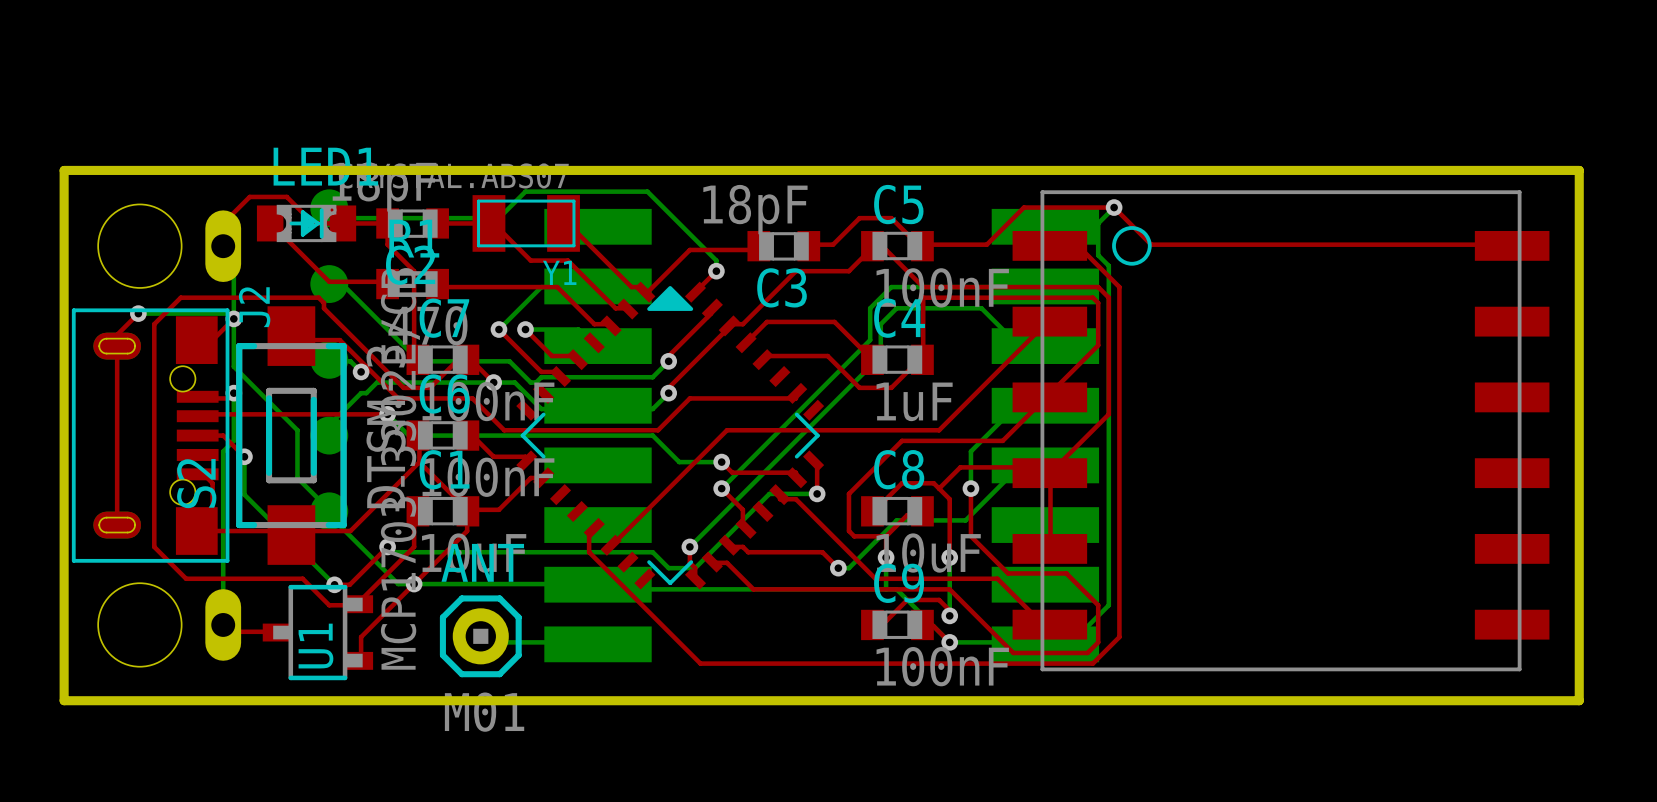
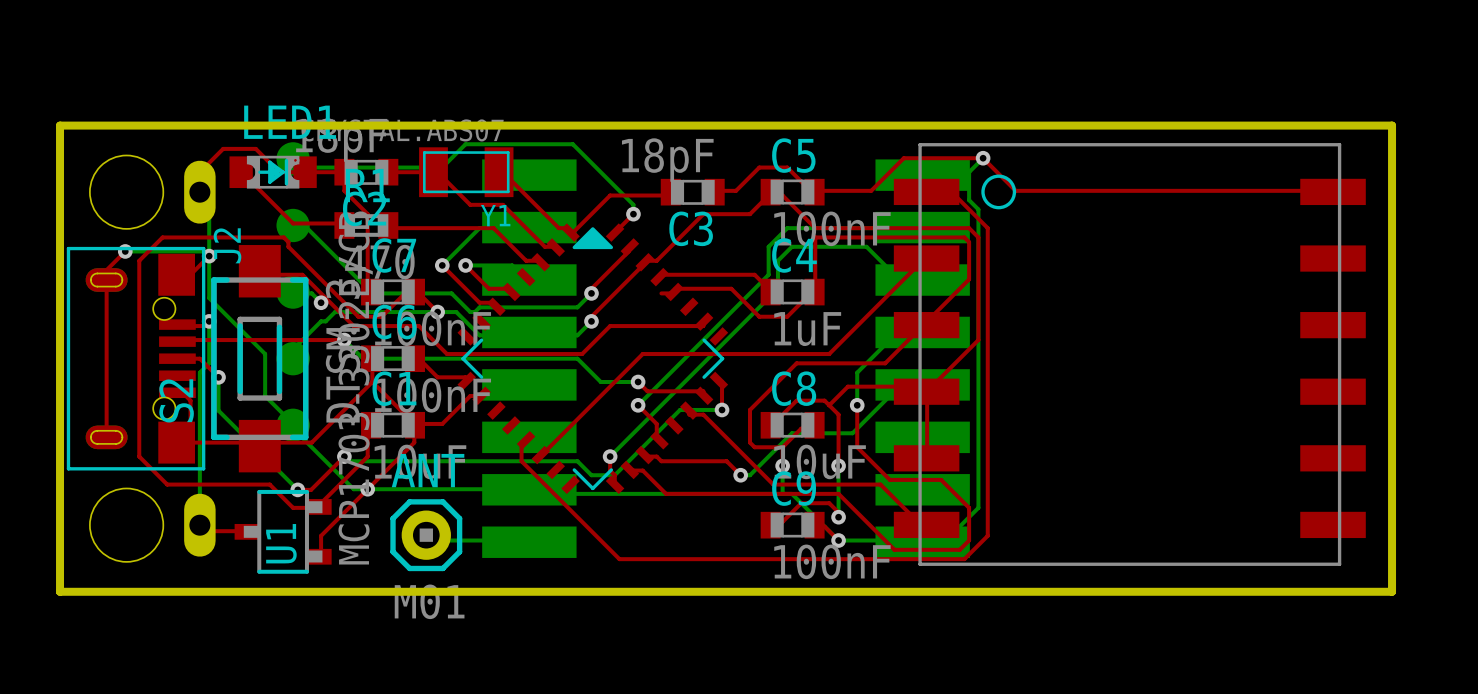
top track: (746, 342) (766, 321) (834, 321) (872, 359) -> (659, 277) (661, 274) (754, 274) (770, 292)
top track: none -> (675, 288) (674, 291) (670, 293) (661, 293)

